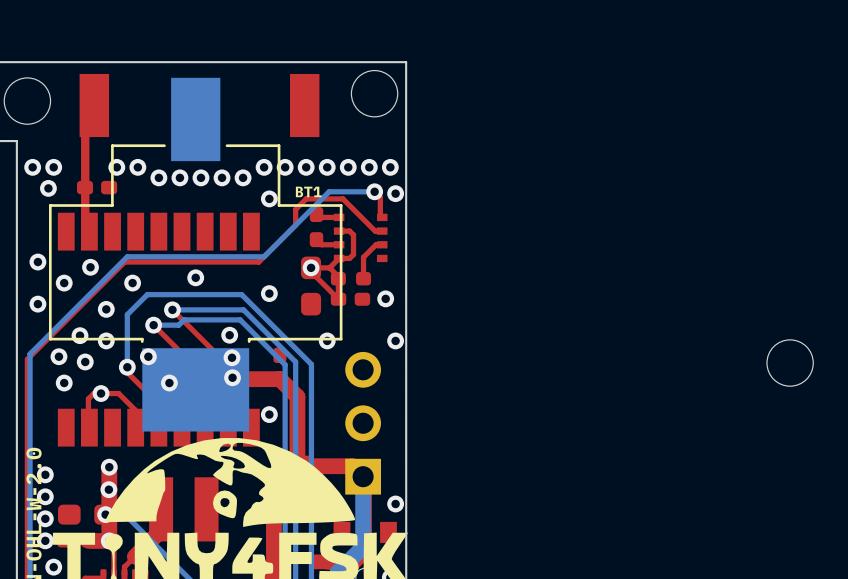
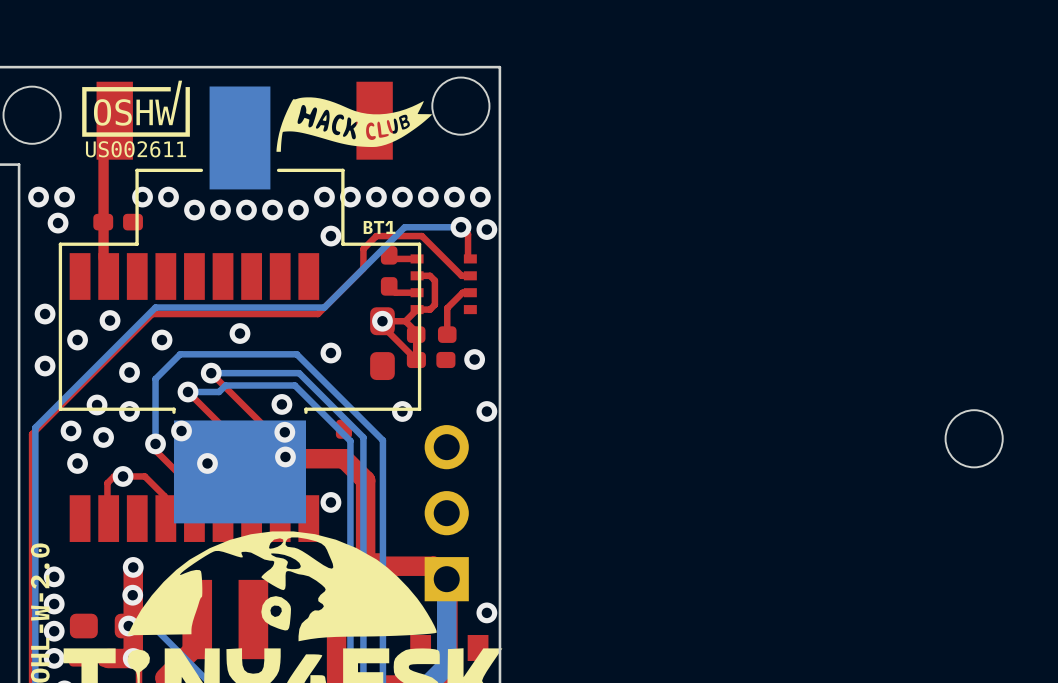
drawing: none -> [82, 80, 190, 158]
drawing: none -> [276, 97, 433, 152]

